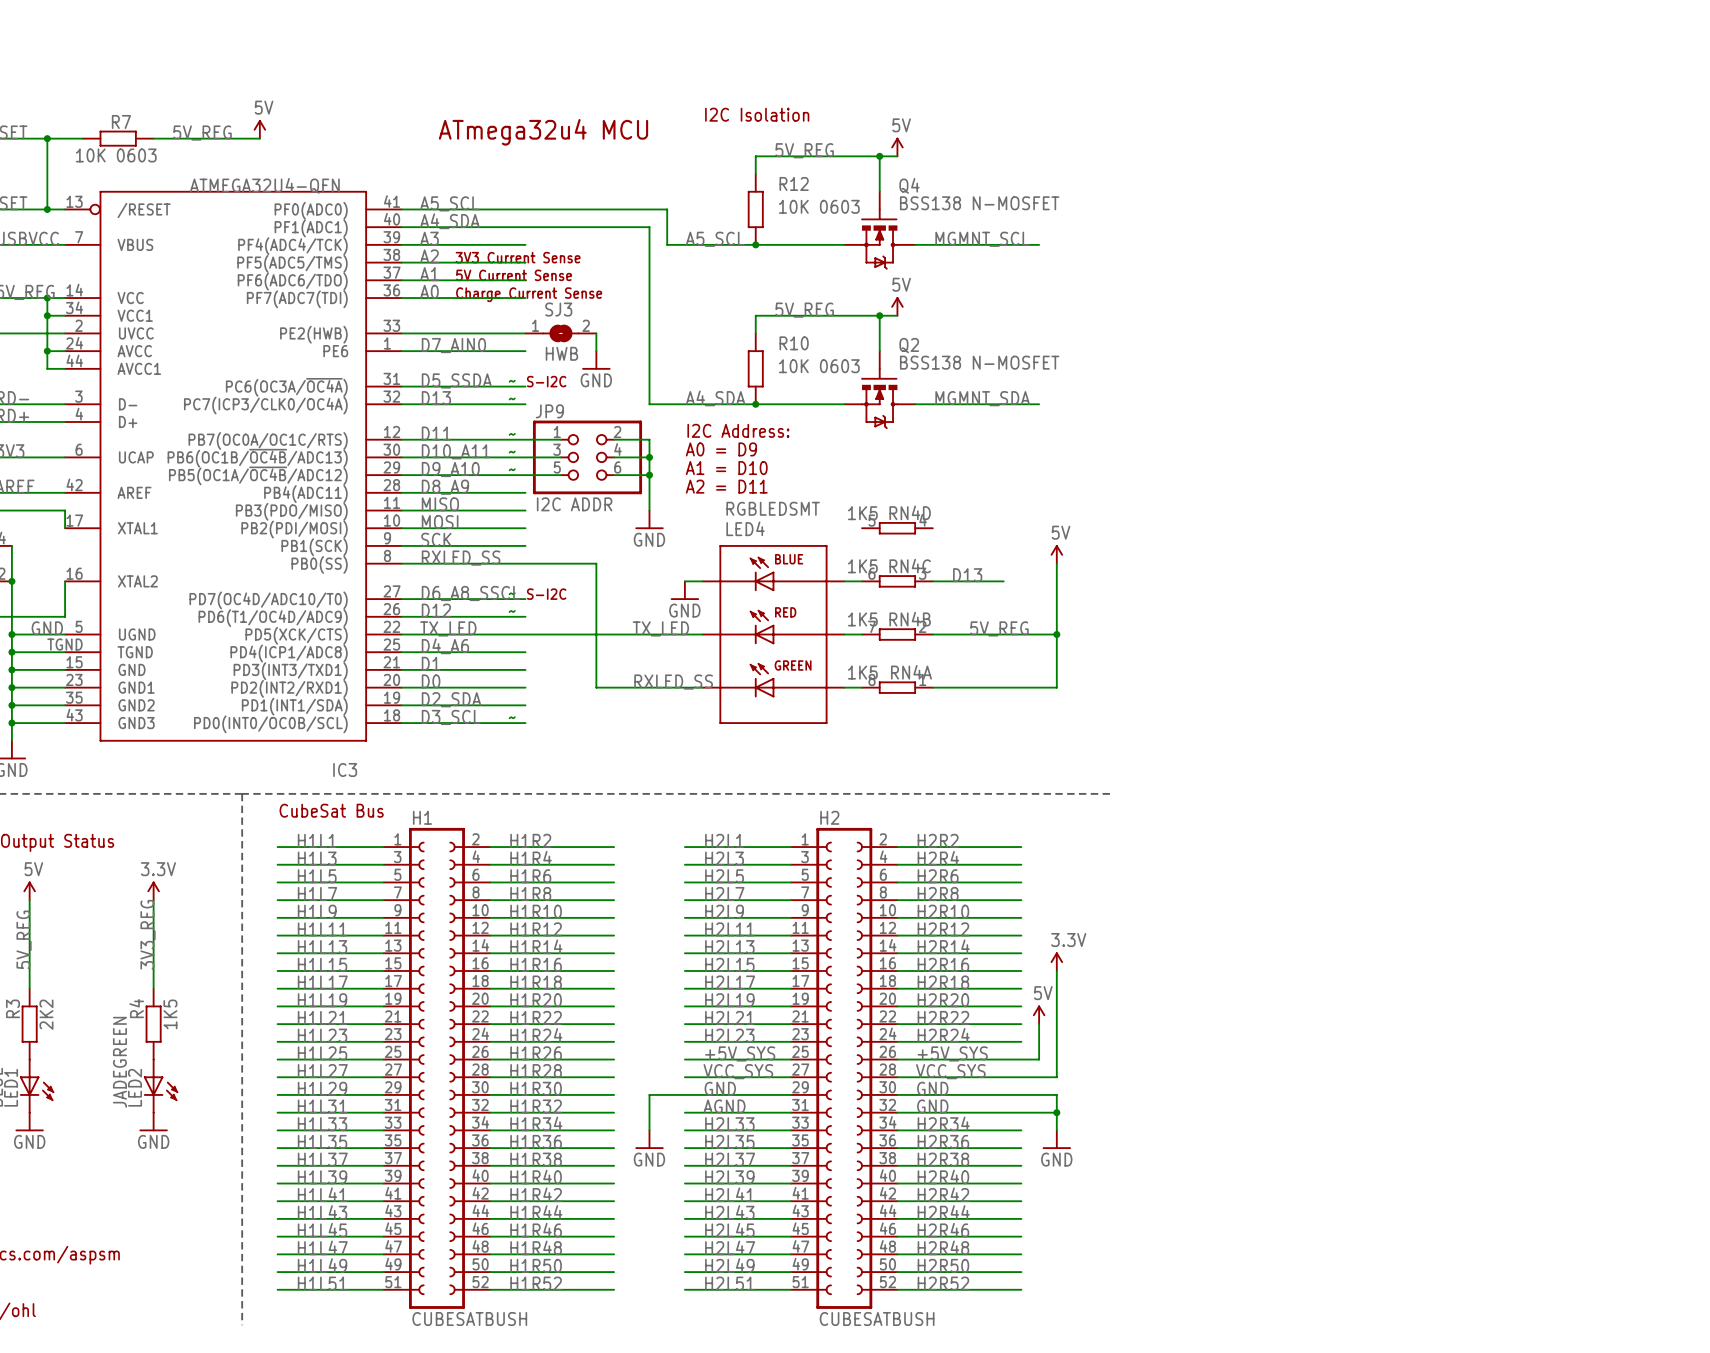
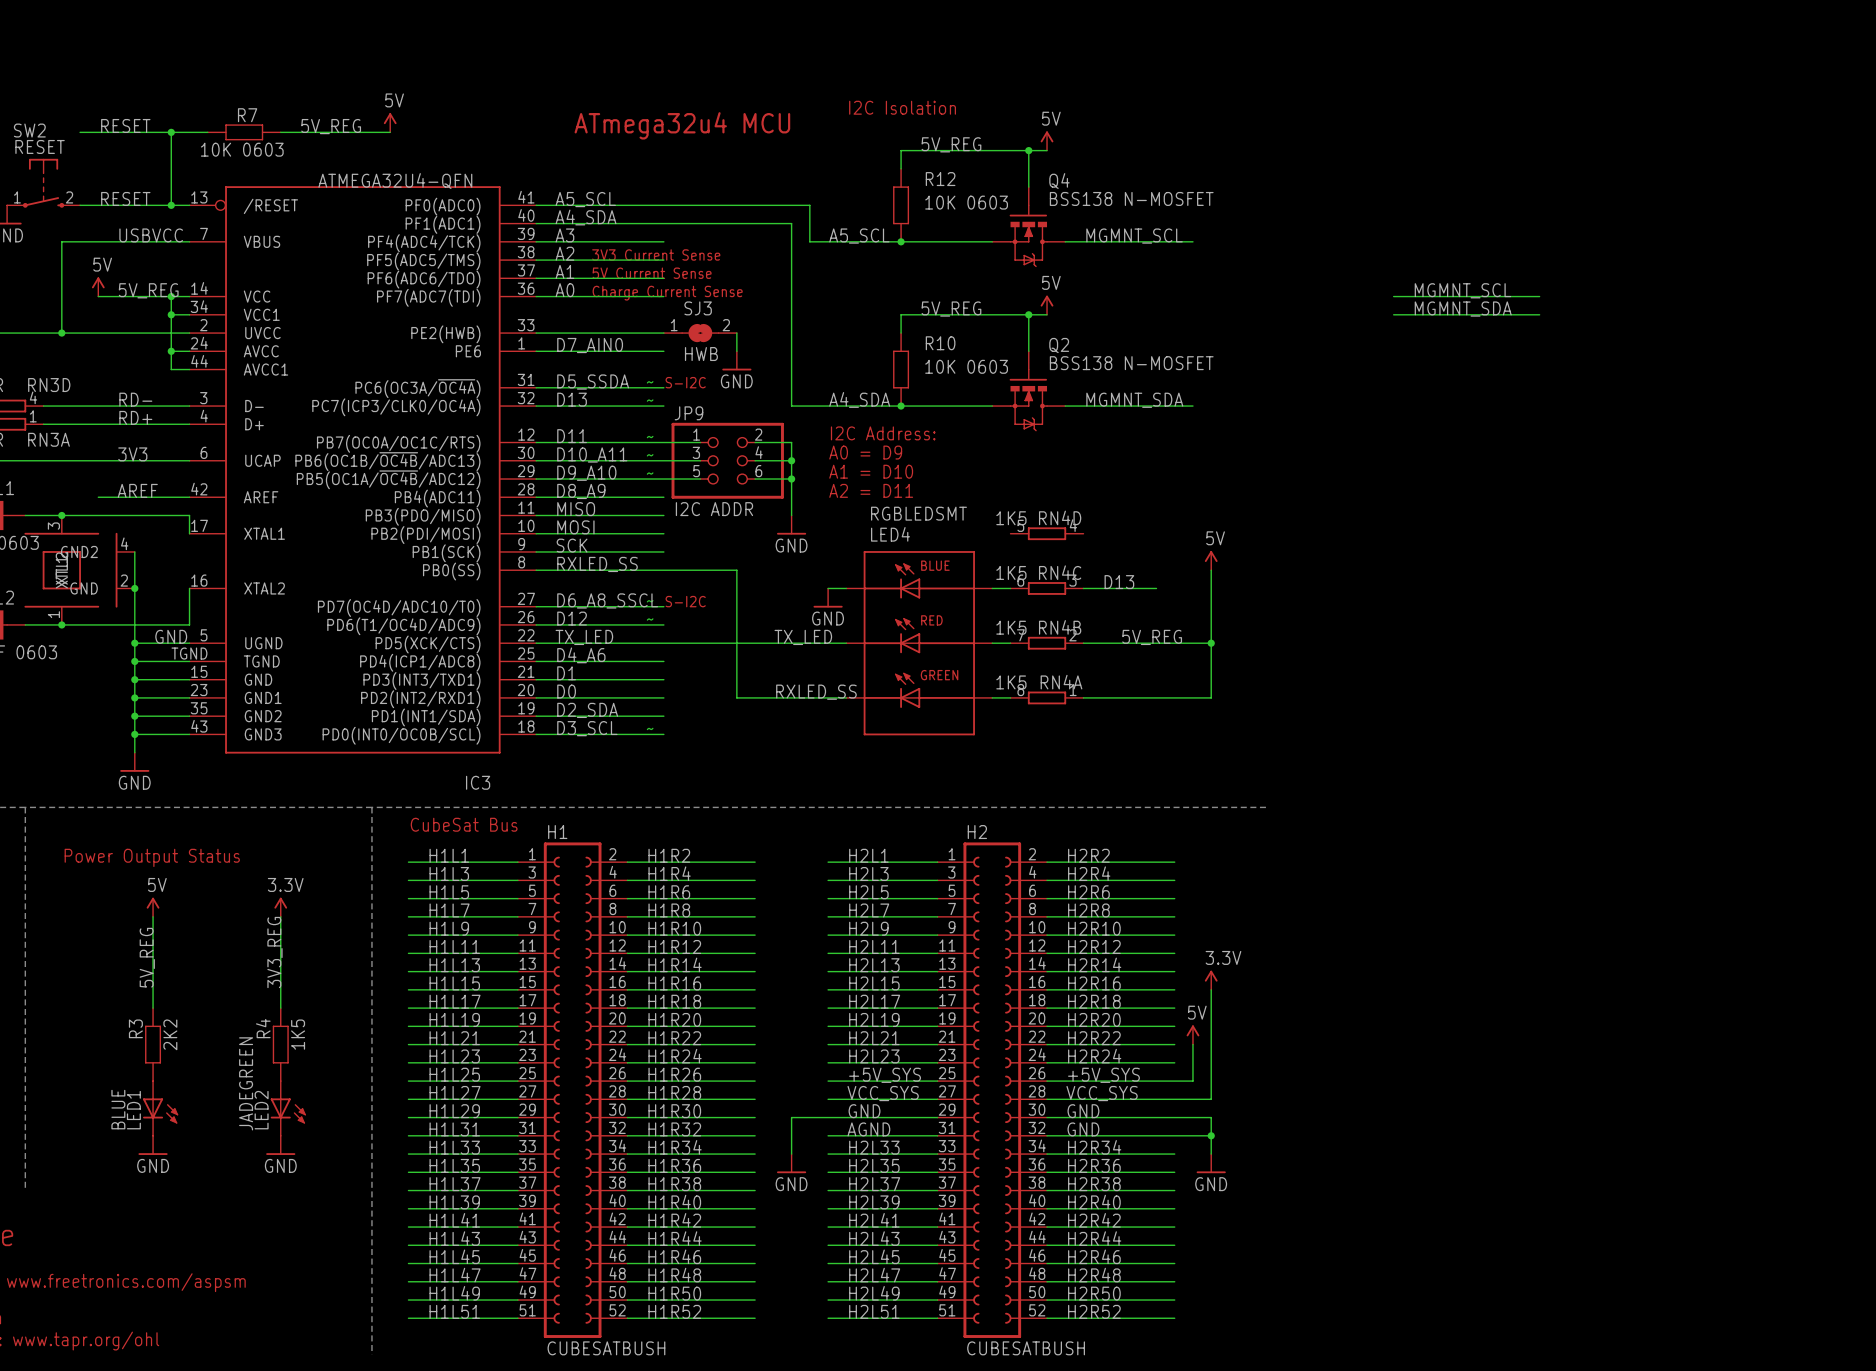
label: none -> MGMNT_SCL (1462, 290)
wire: none -> (1393, 296) (1539, 296)
label: none -> MGMNT_SDA (1463, 309)
wire: none -> (1393, 314) (1539, 314)

